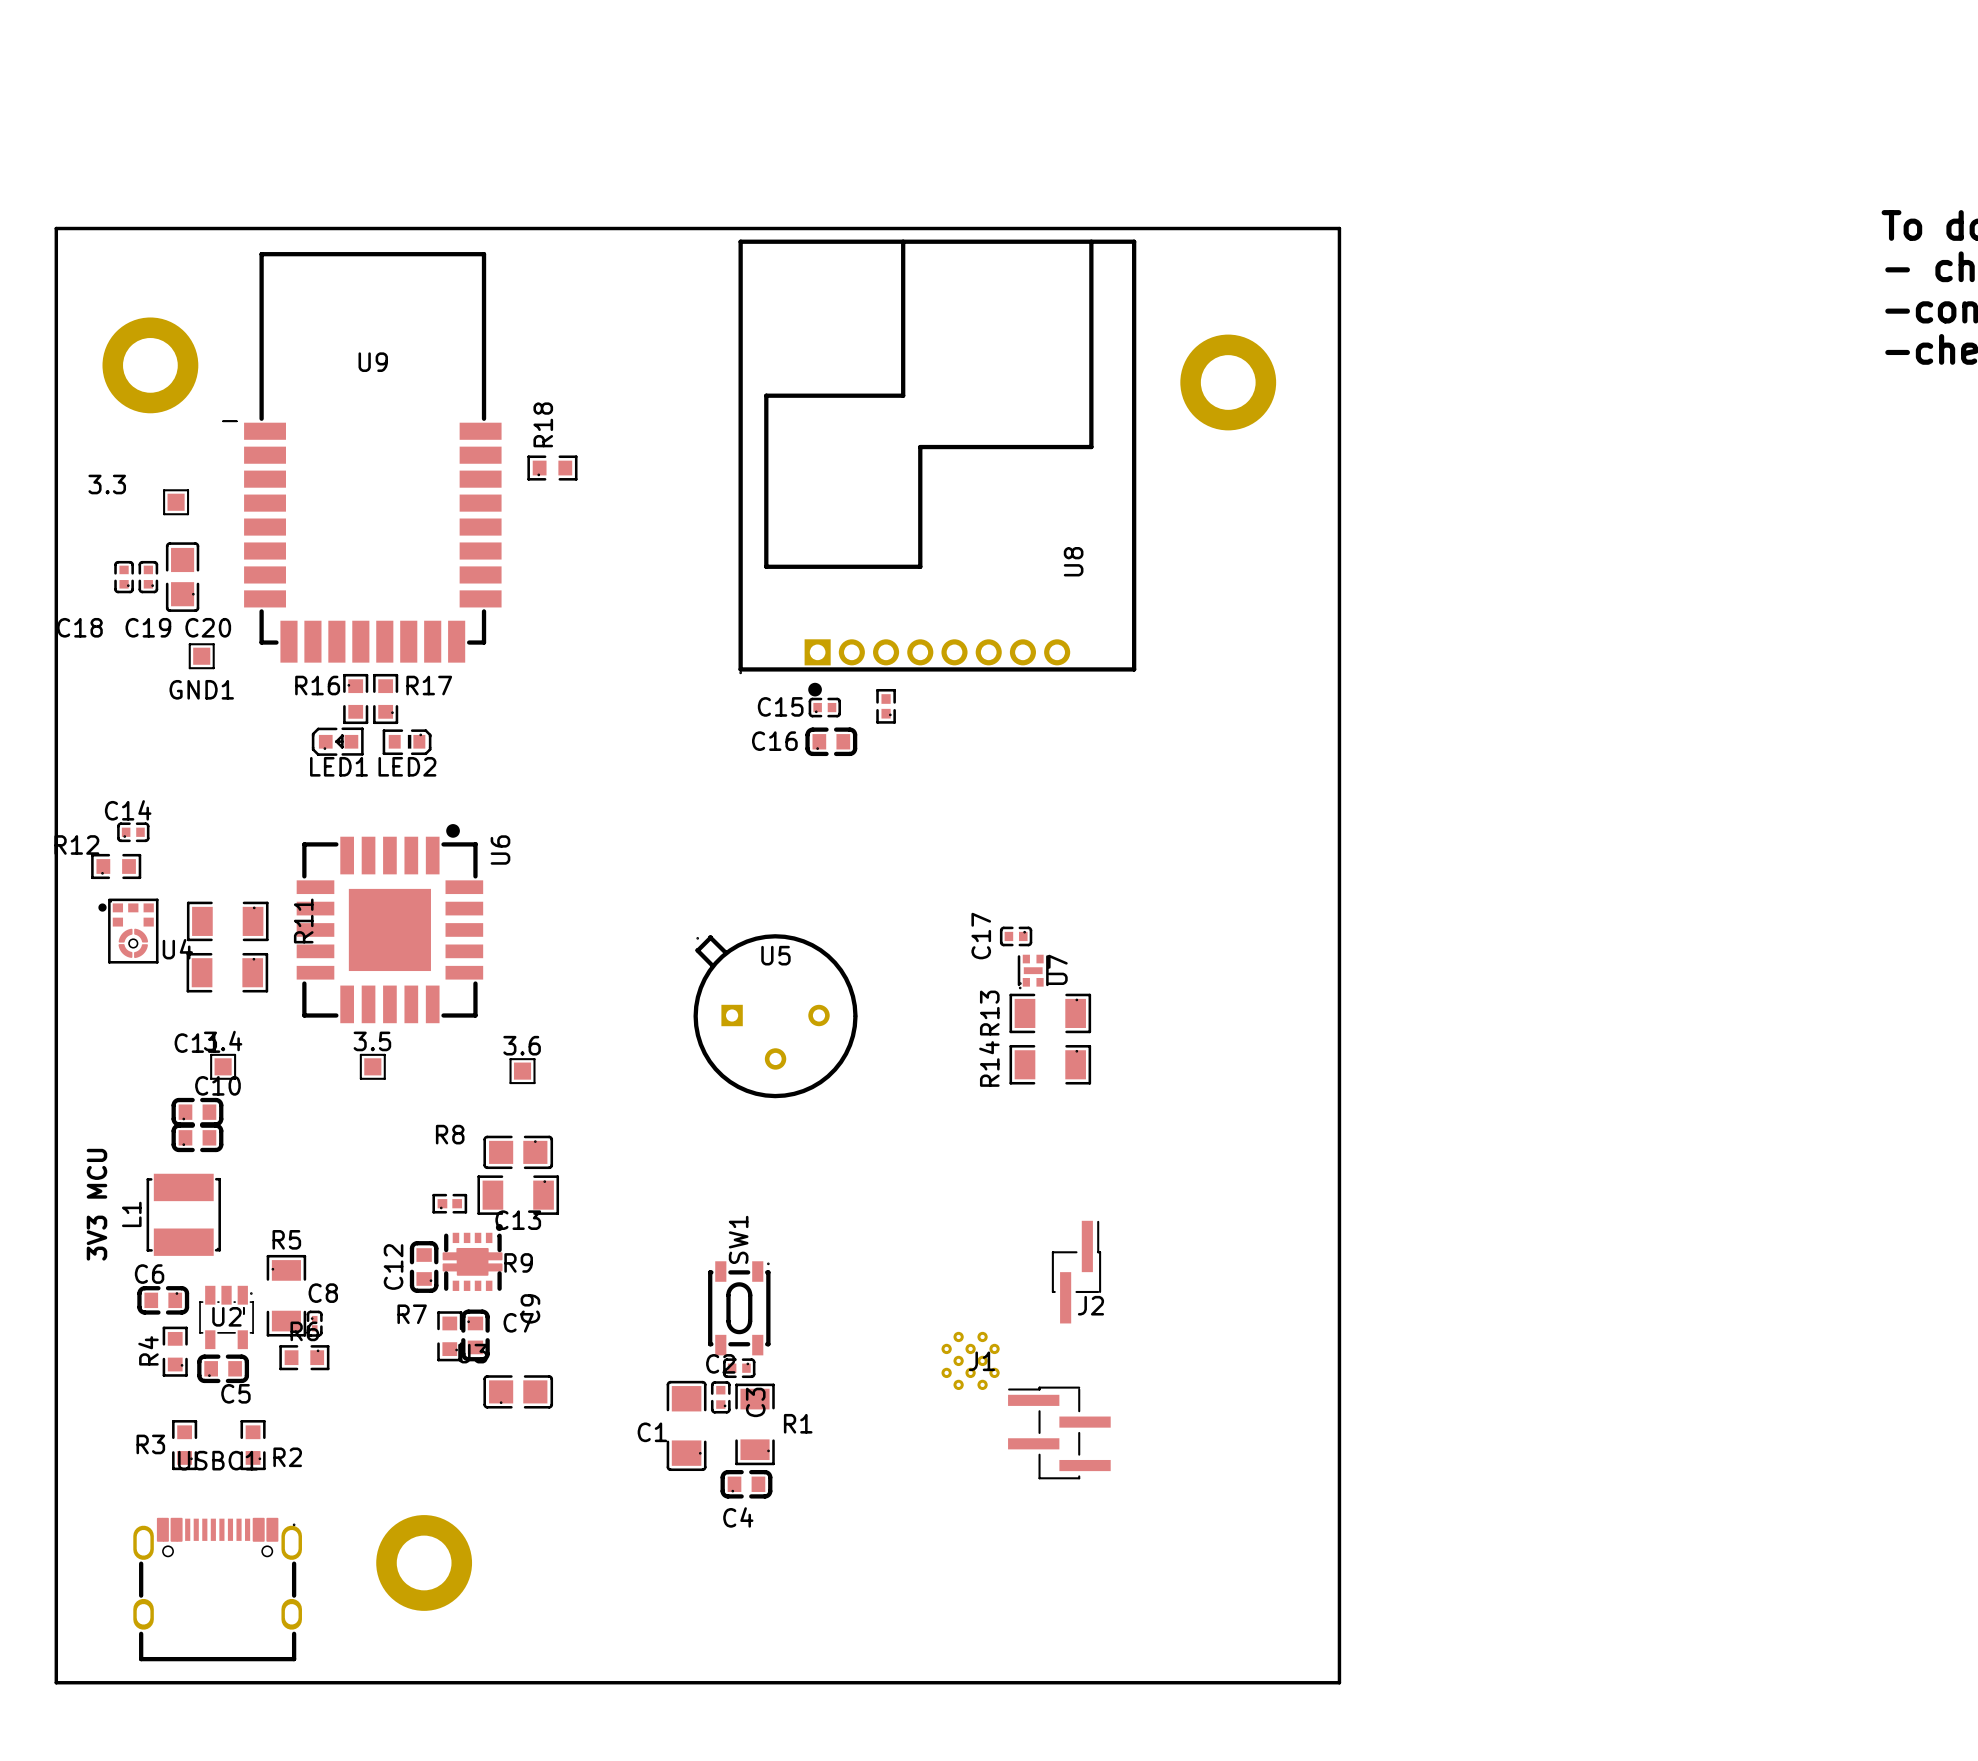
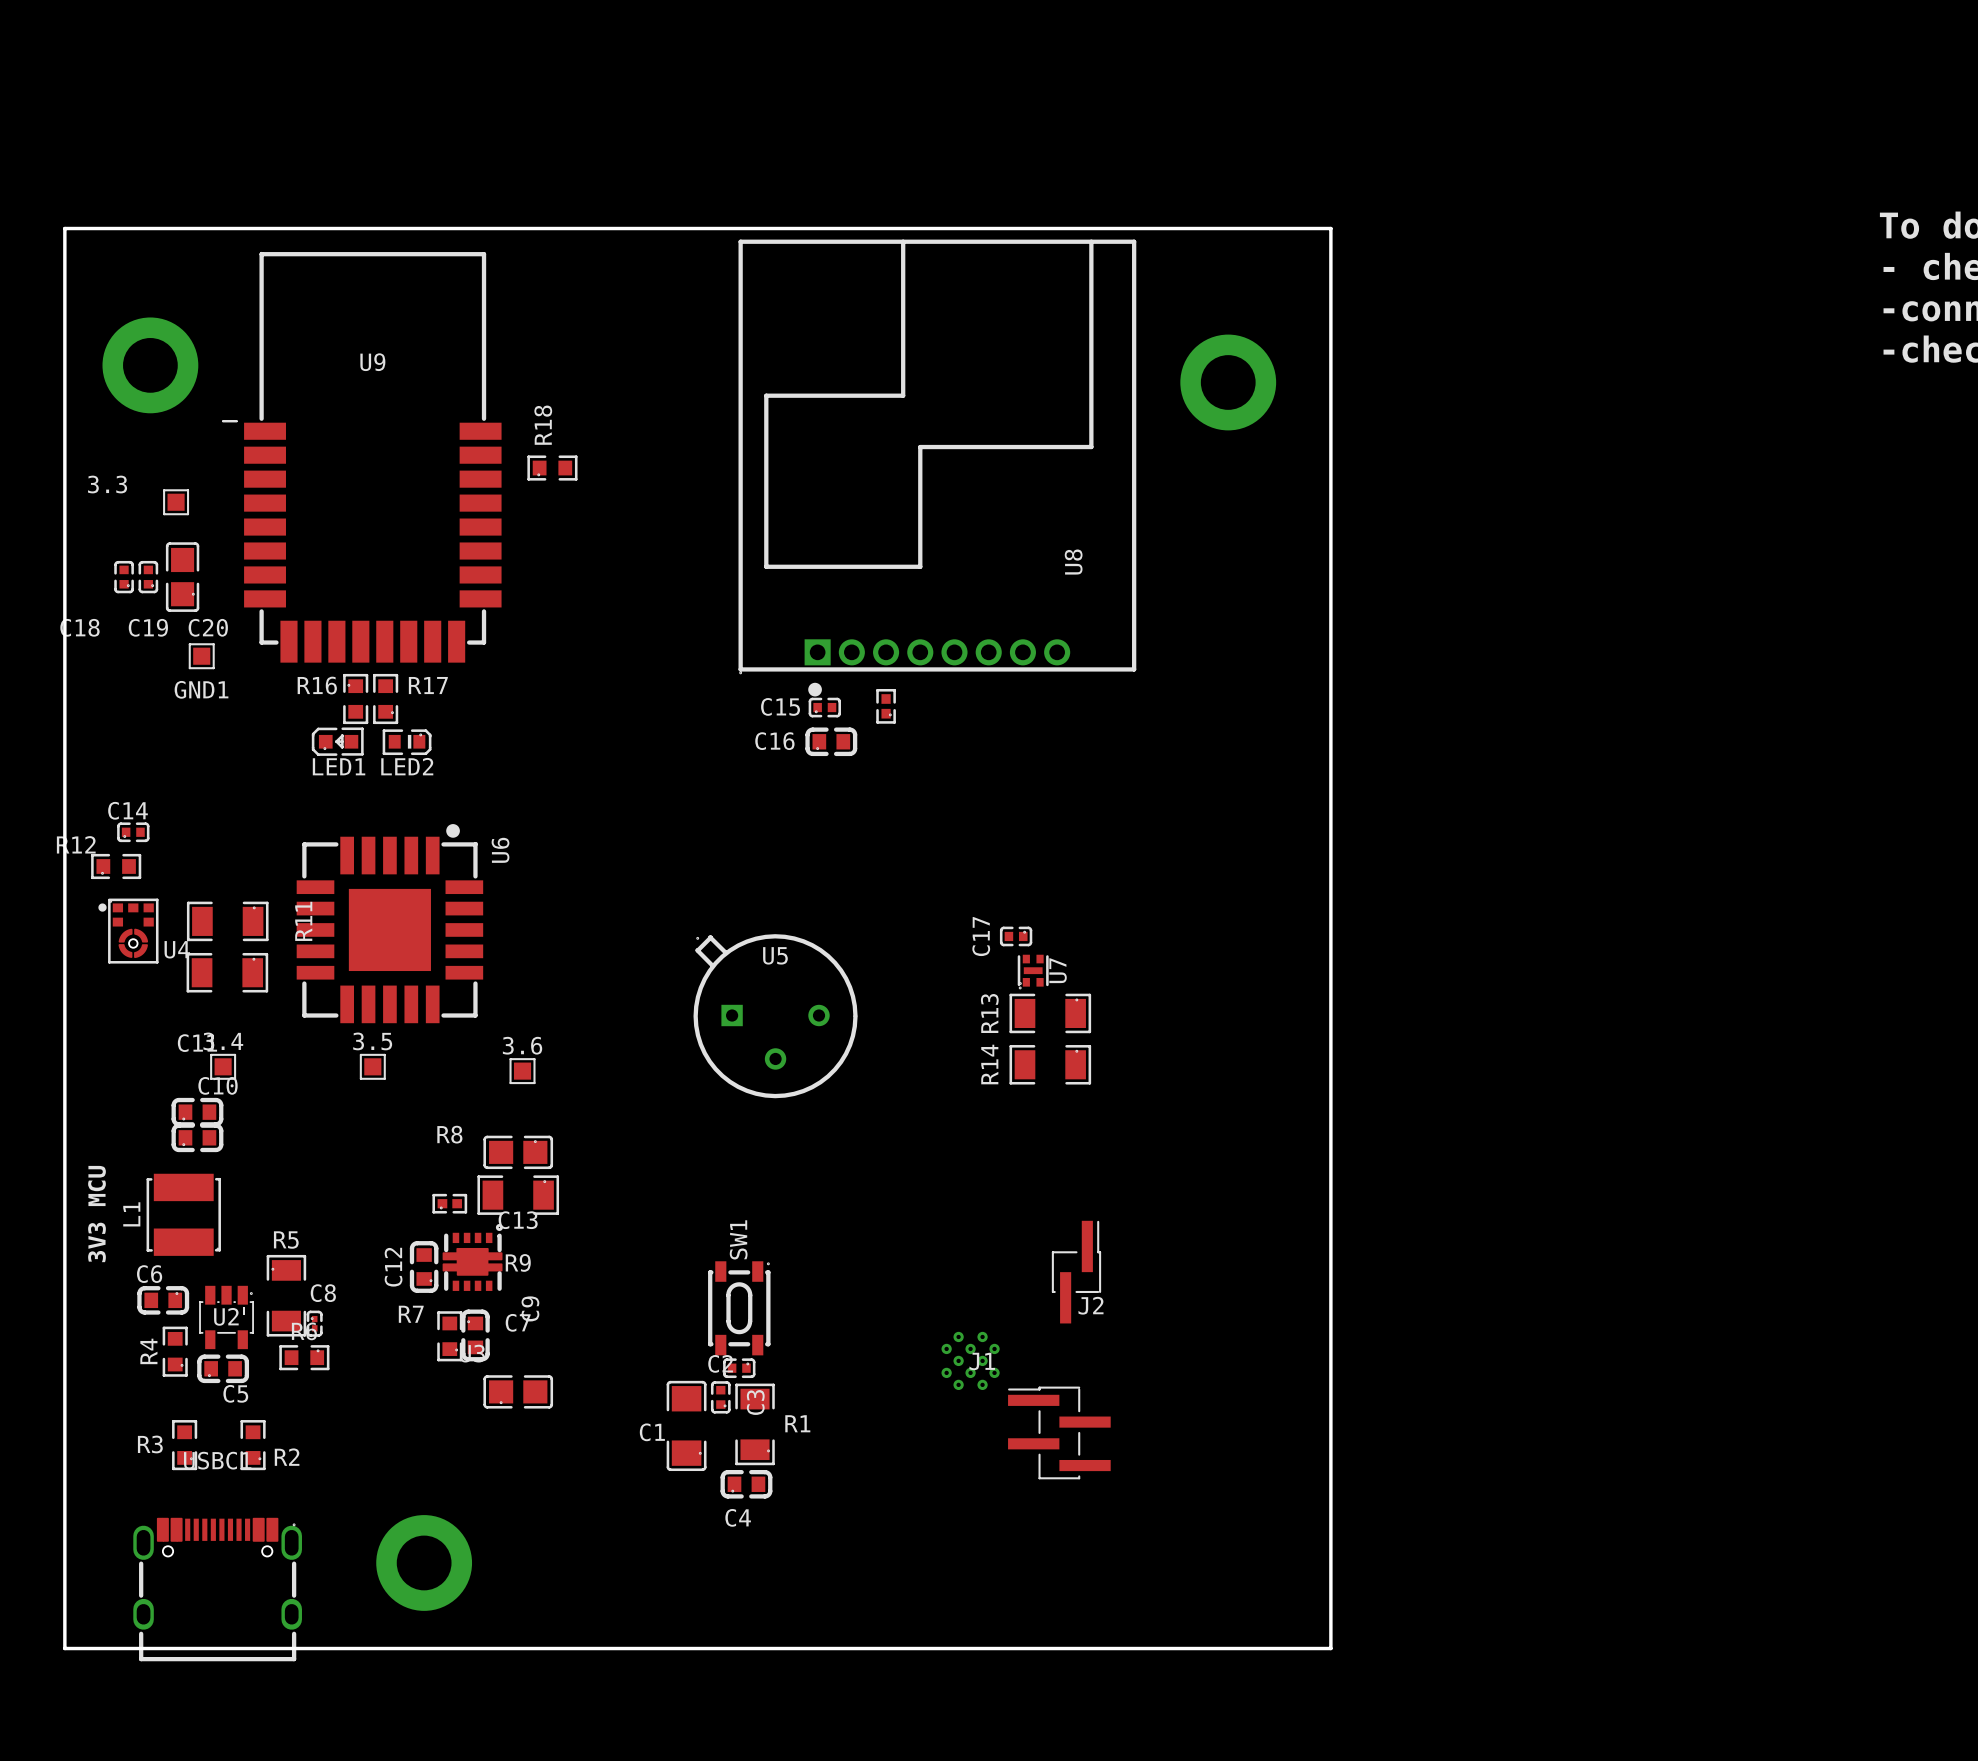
board edge: (64, 228) (56, 228) (56, 1682) (1339, 1682) (1339, 228) (1330, 228) -> (64, 228) (64, 1648) (1330, 1648) (1330, 228)

